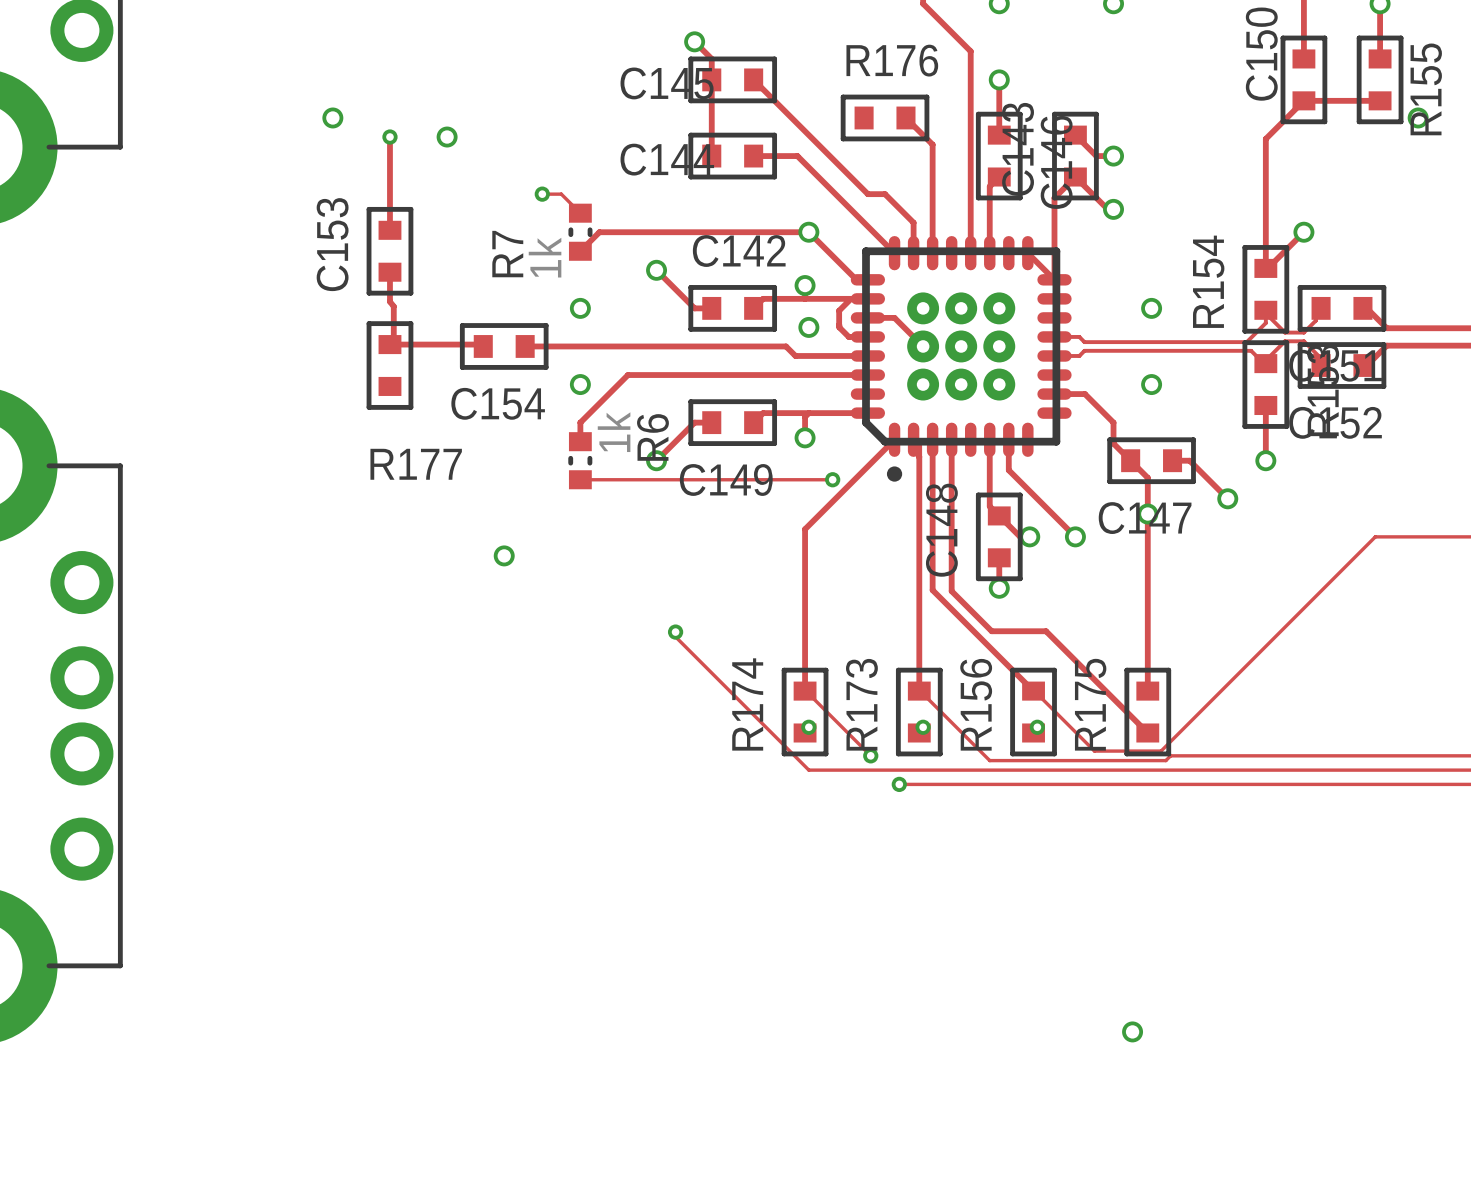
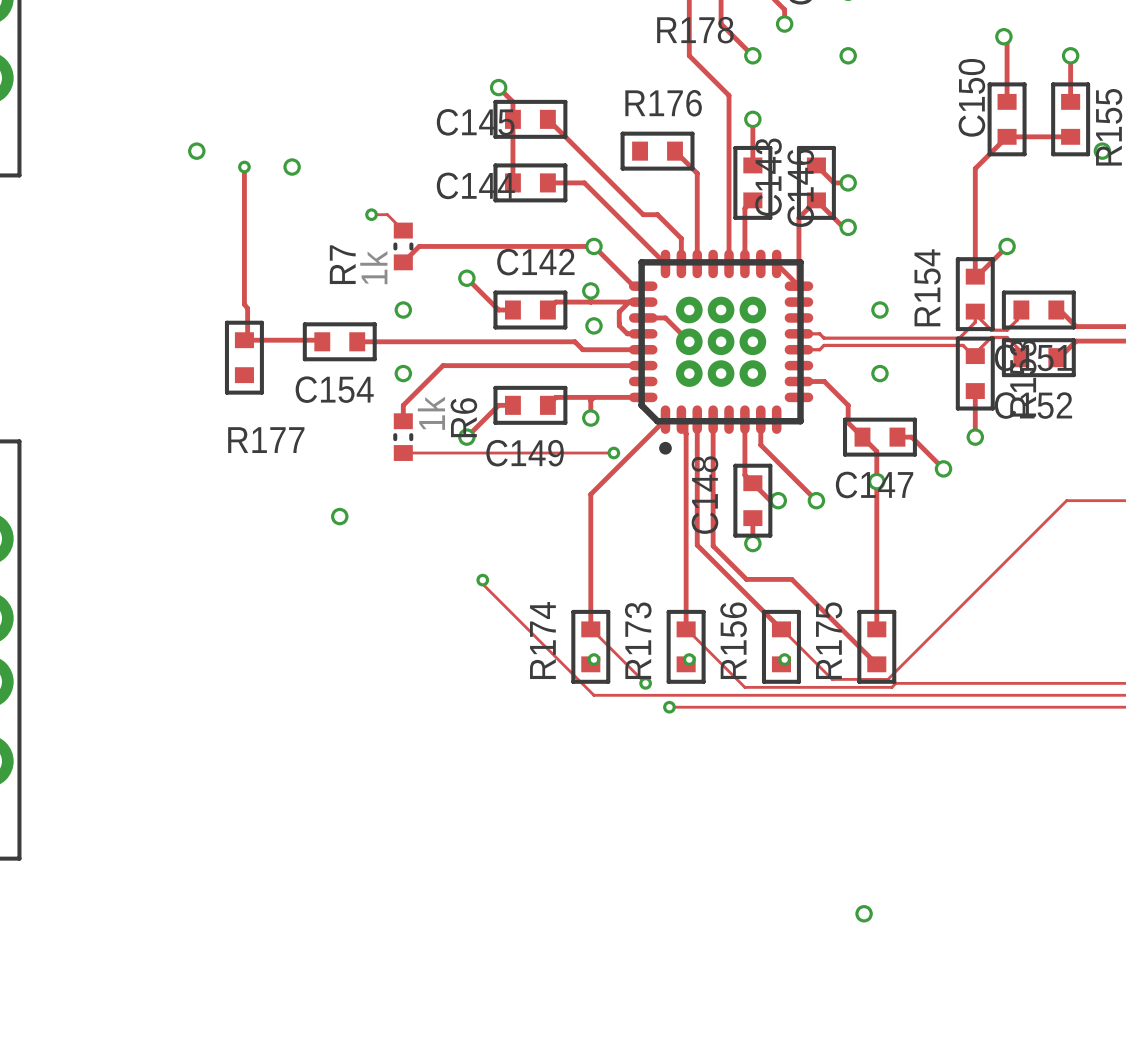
top track: none -> (244, 244) (244, 279)
C153: (389, 251) -> none

